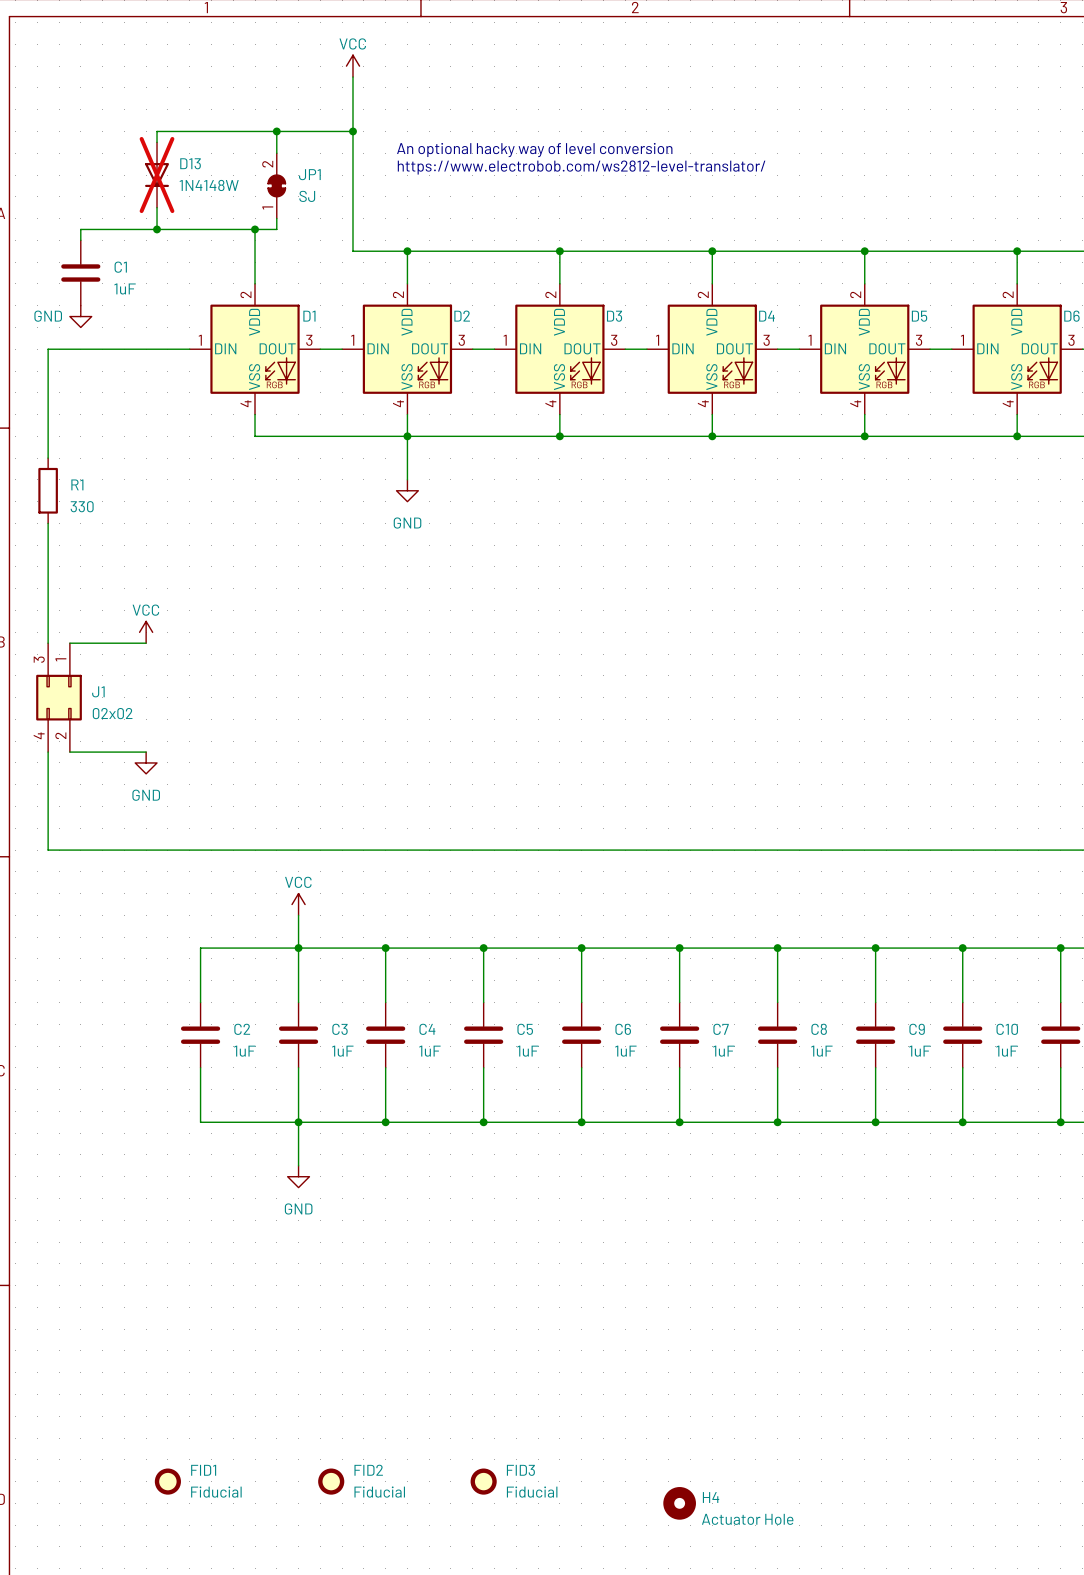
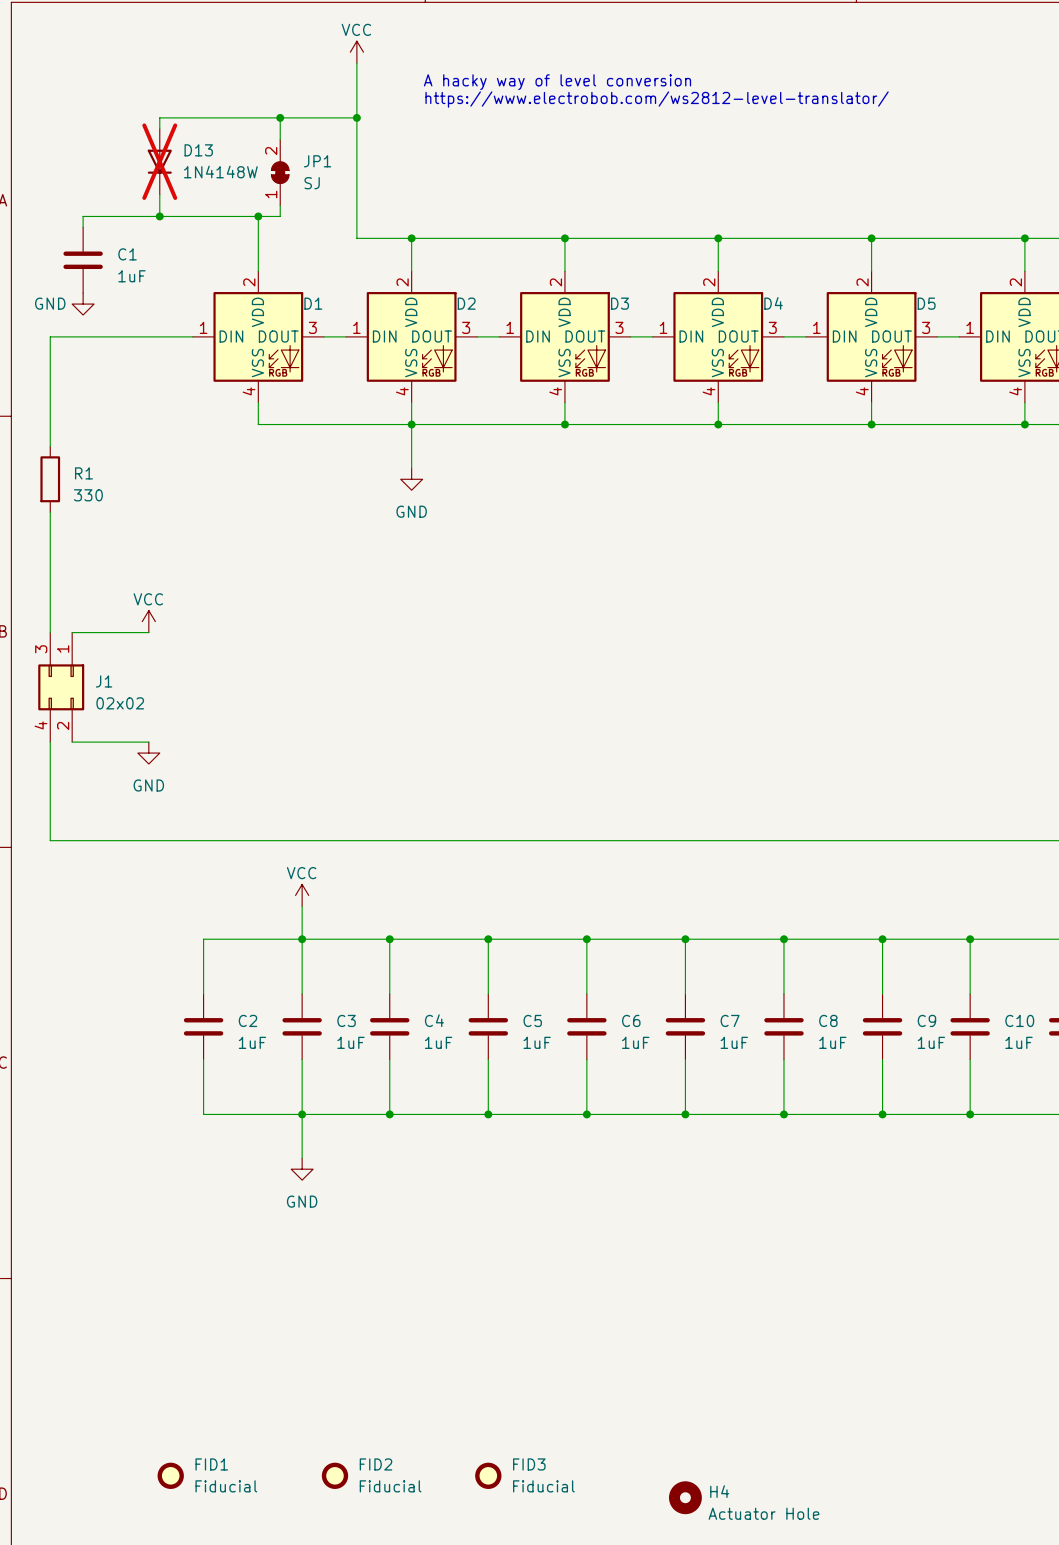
text: none -> A hacky way of level conversion (557, 82)
text: An optional hacky way of level conversion (534, 150) -> none
text position: https://www.electrobob.com/ws2812-level-translator/ (581, 167) -> https://www.electrobob.com/ws2812-level-translator/ (657, 99)

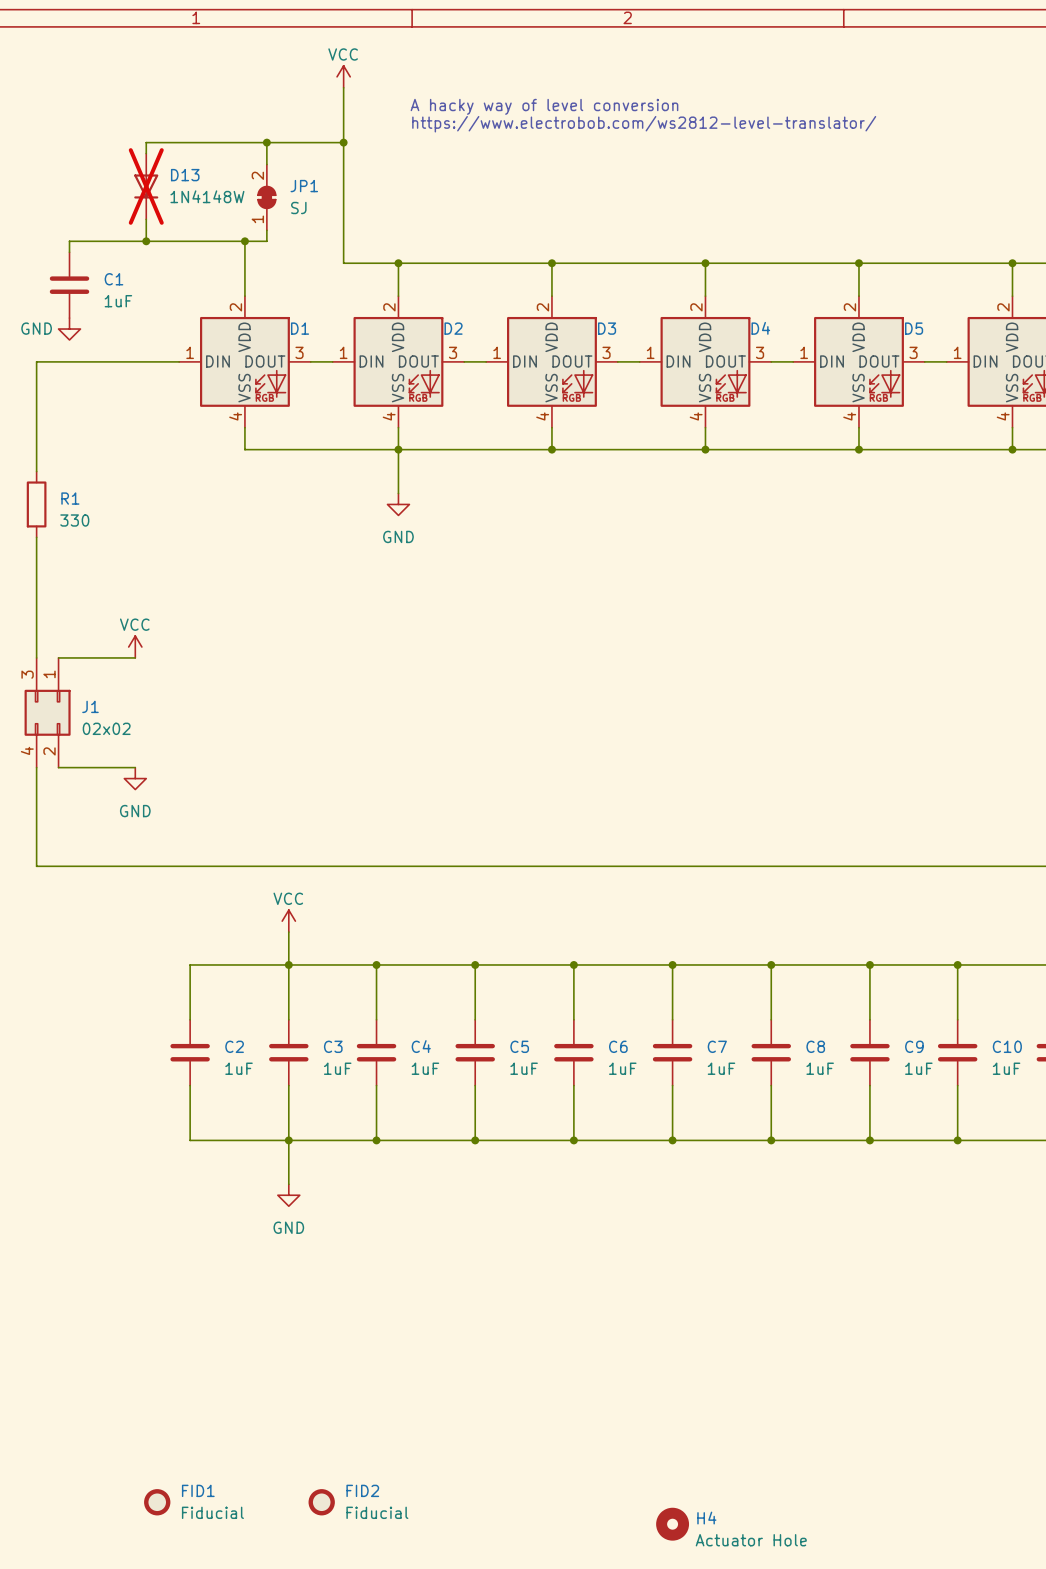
FID3: Fiducial (488, 1475) -> none

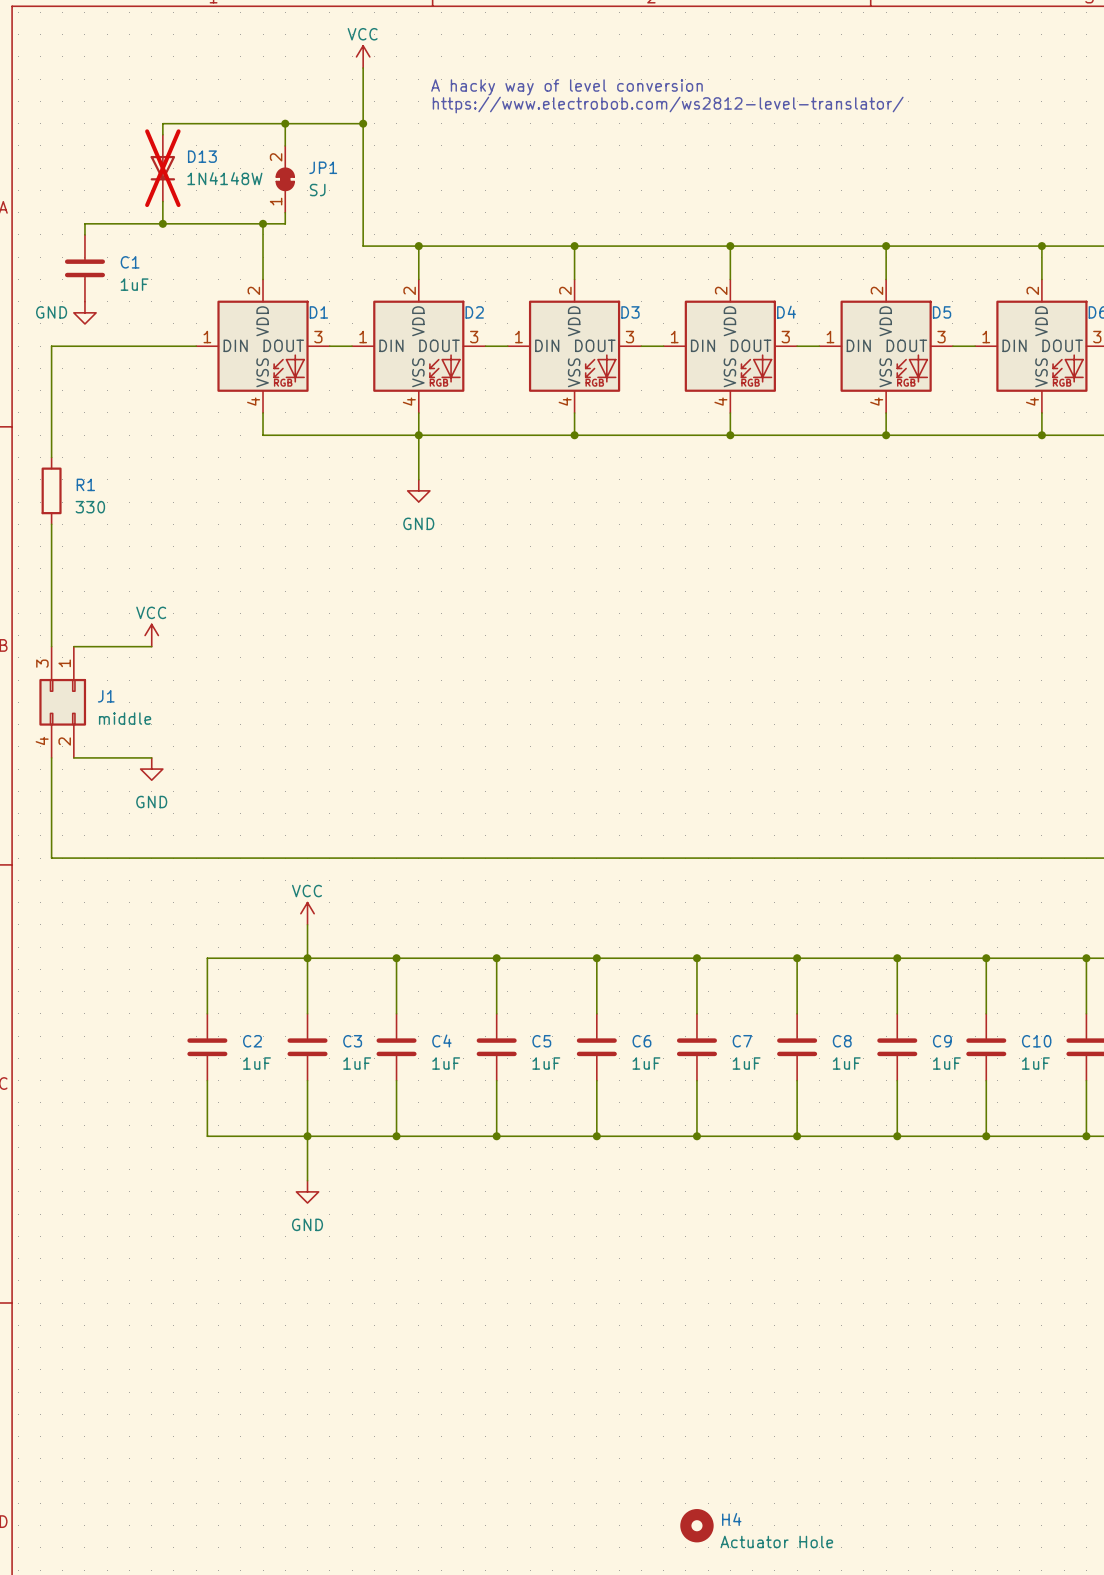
J1 value: 02x02 (106, 728) -> middle (125, 718)
FID1: Fiducial (157, 1502) -> none
FID2: Fiducial (321, 1502) -> none

